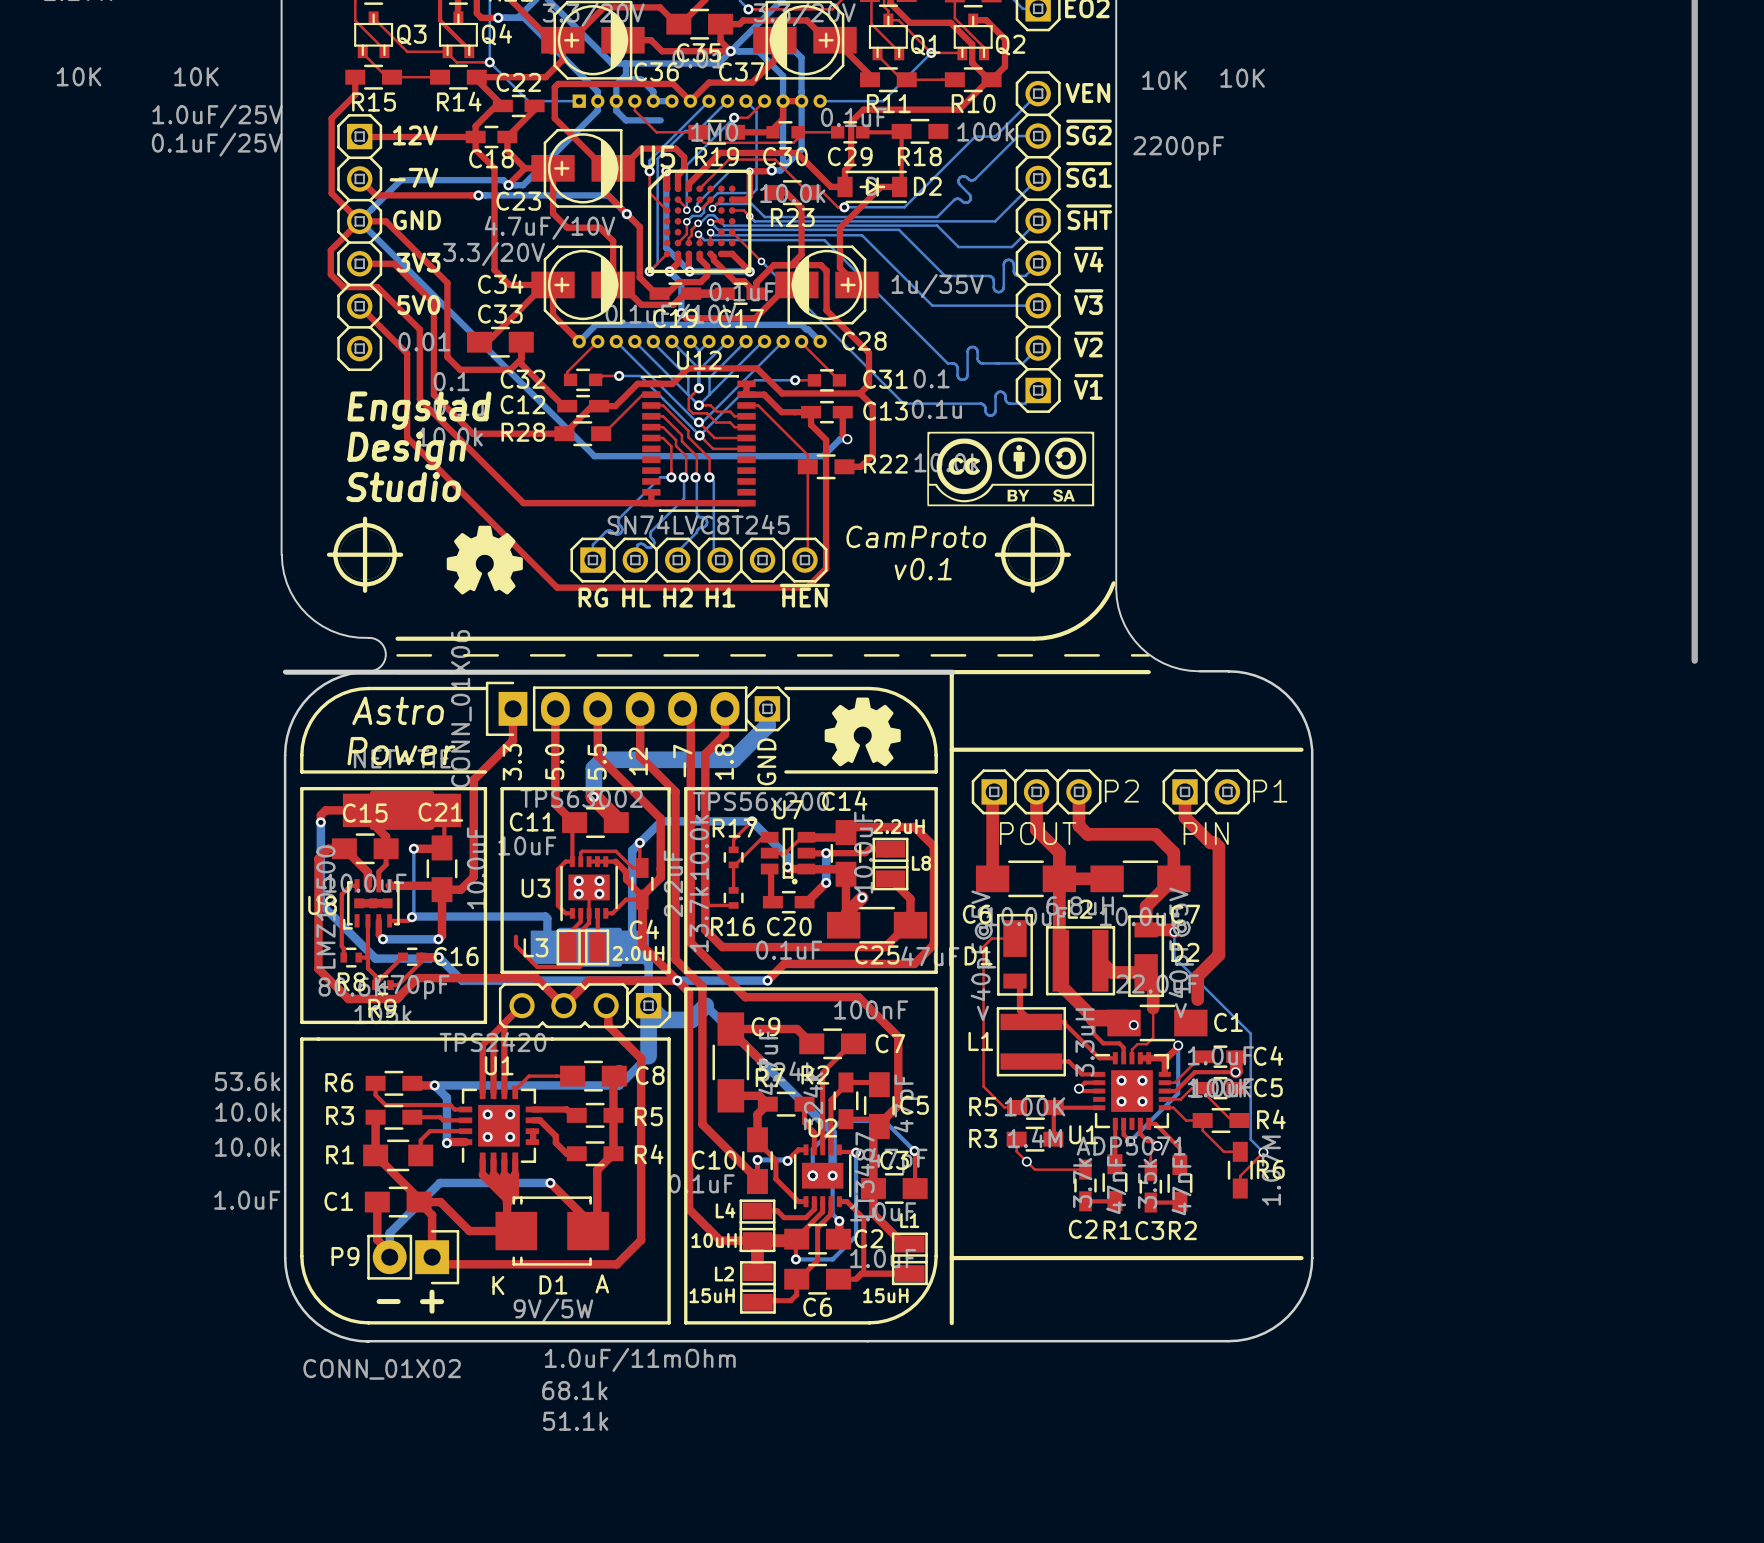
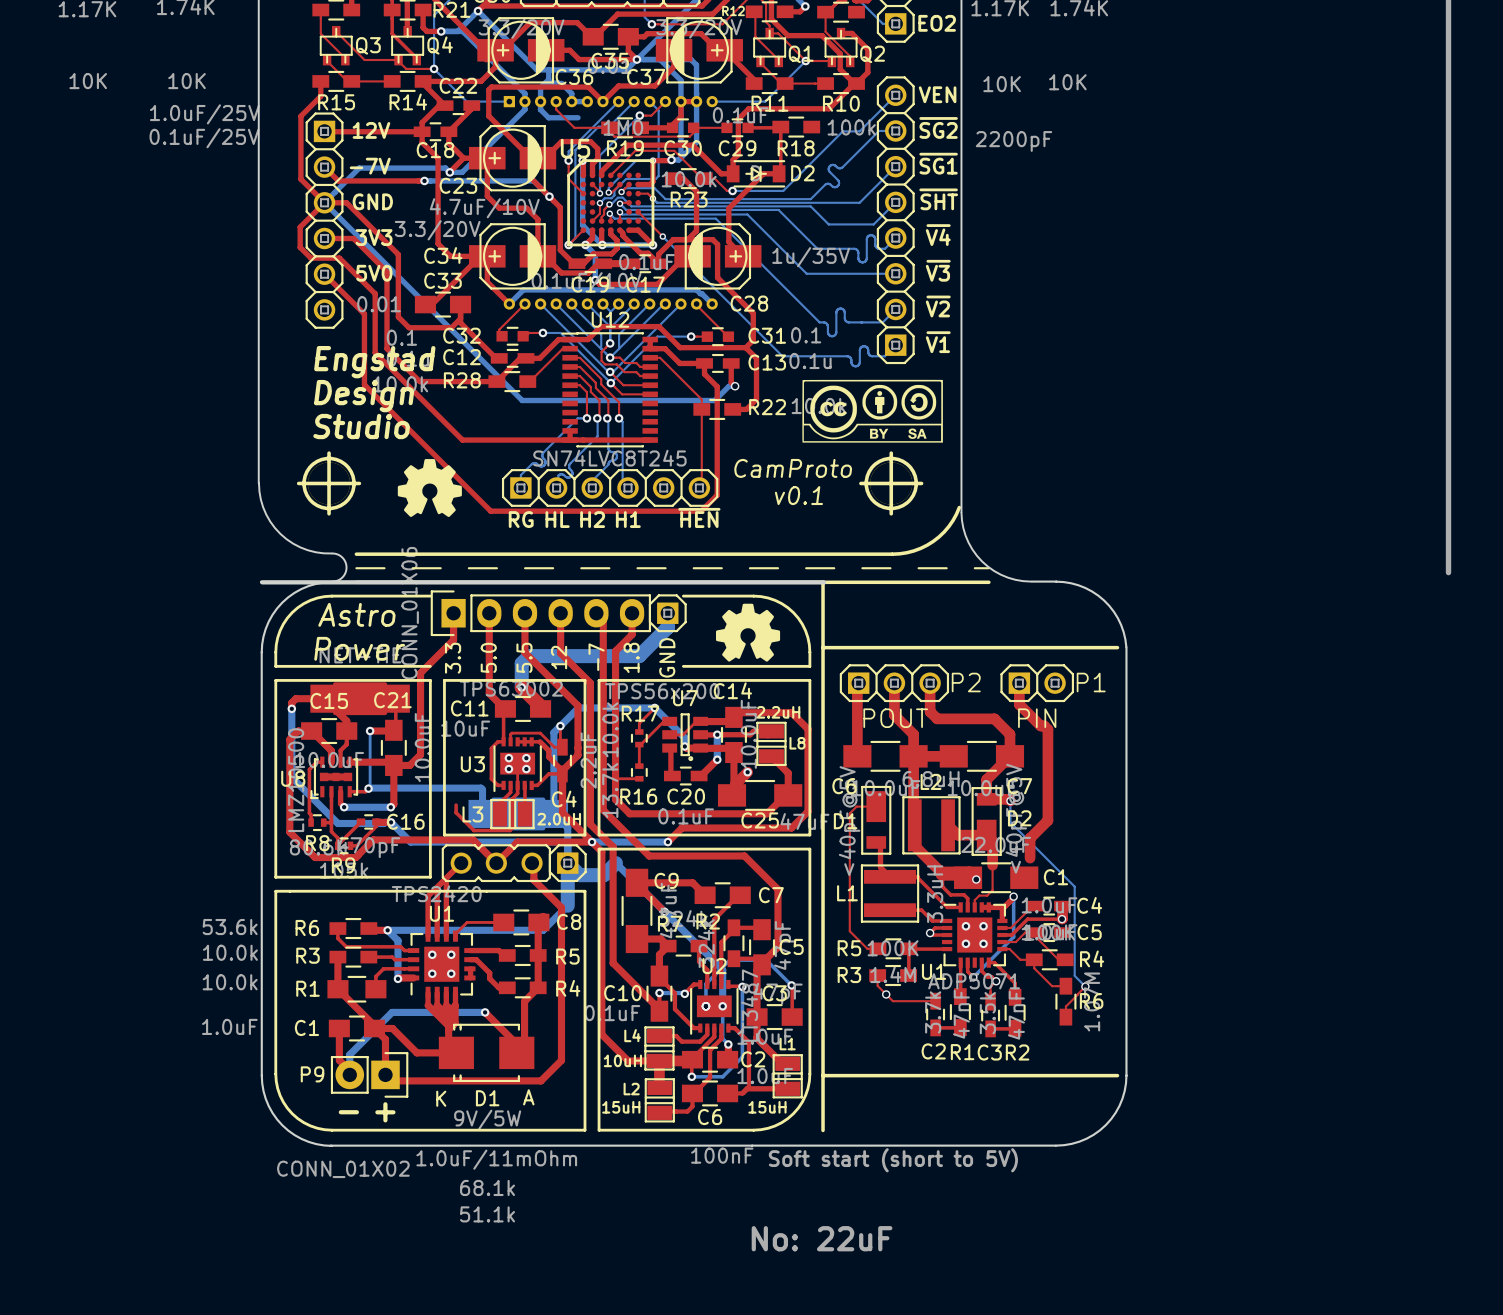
C7 value position: 100nF (871, 1009) -> 100nF (722, 1155)
text: none -> Soft start (short to 5V) (893, 1160)
C8 value position: 1.0uF/11mOhm (640, 1359) -> 1.0uF/11mOhm (496, 1159)
R5 value position: 68.1k (574, 1390) -> 68.1k (487, 1187)
R4 value position: 51.1k (575, 1421) -> 51.1k (487, 1214)
text: none -> No: 22uF (822, 1238)

